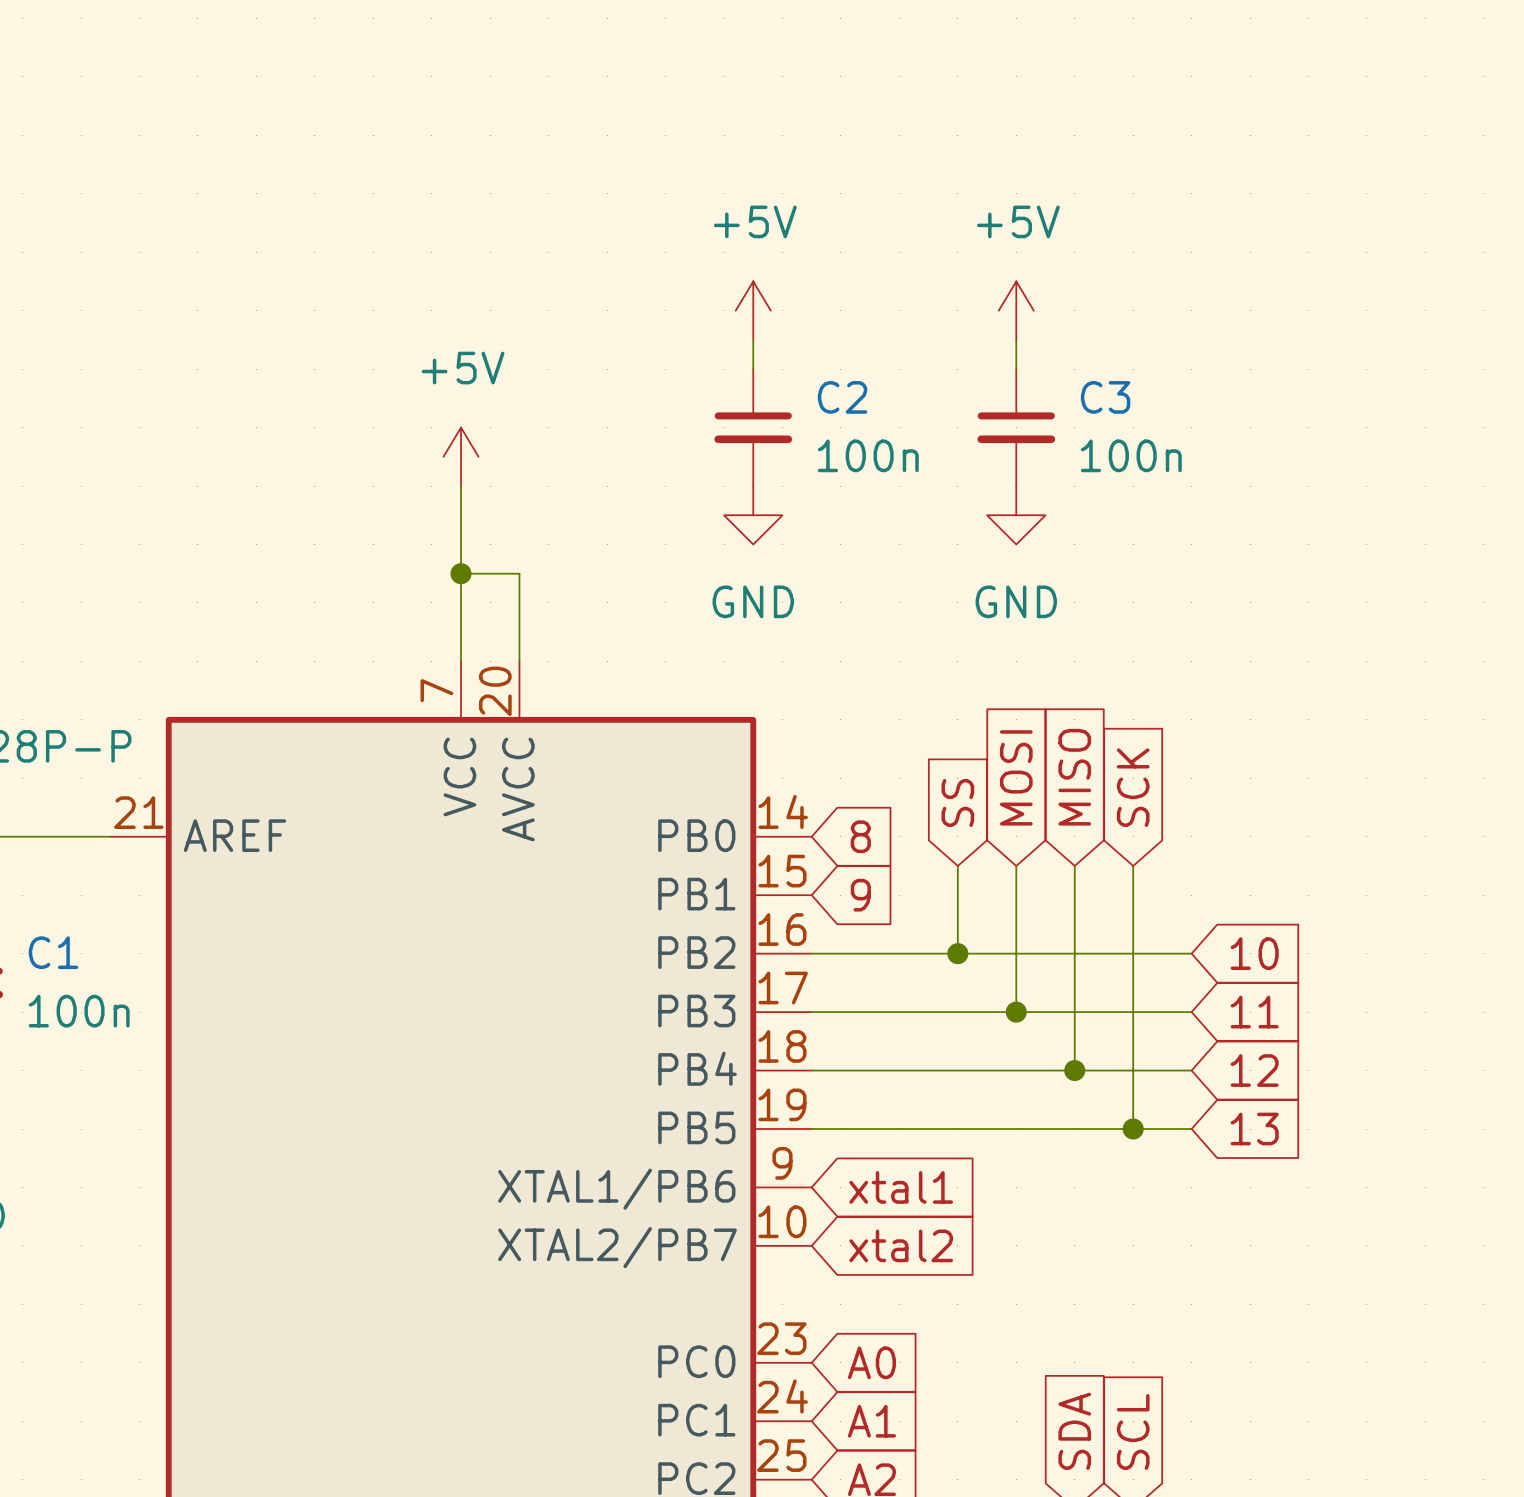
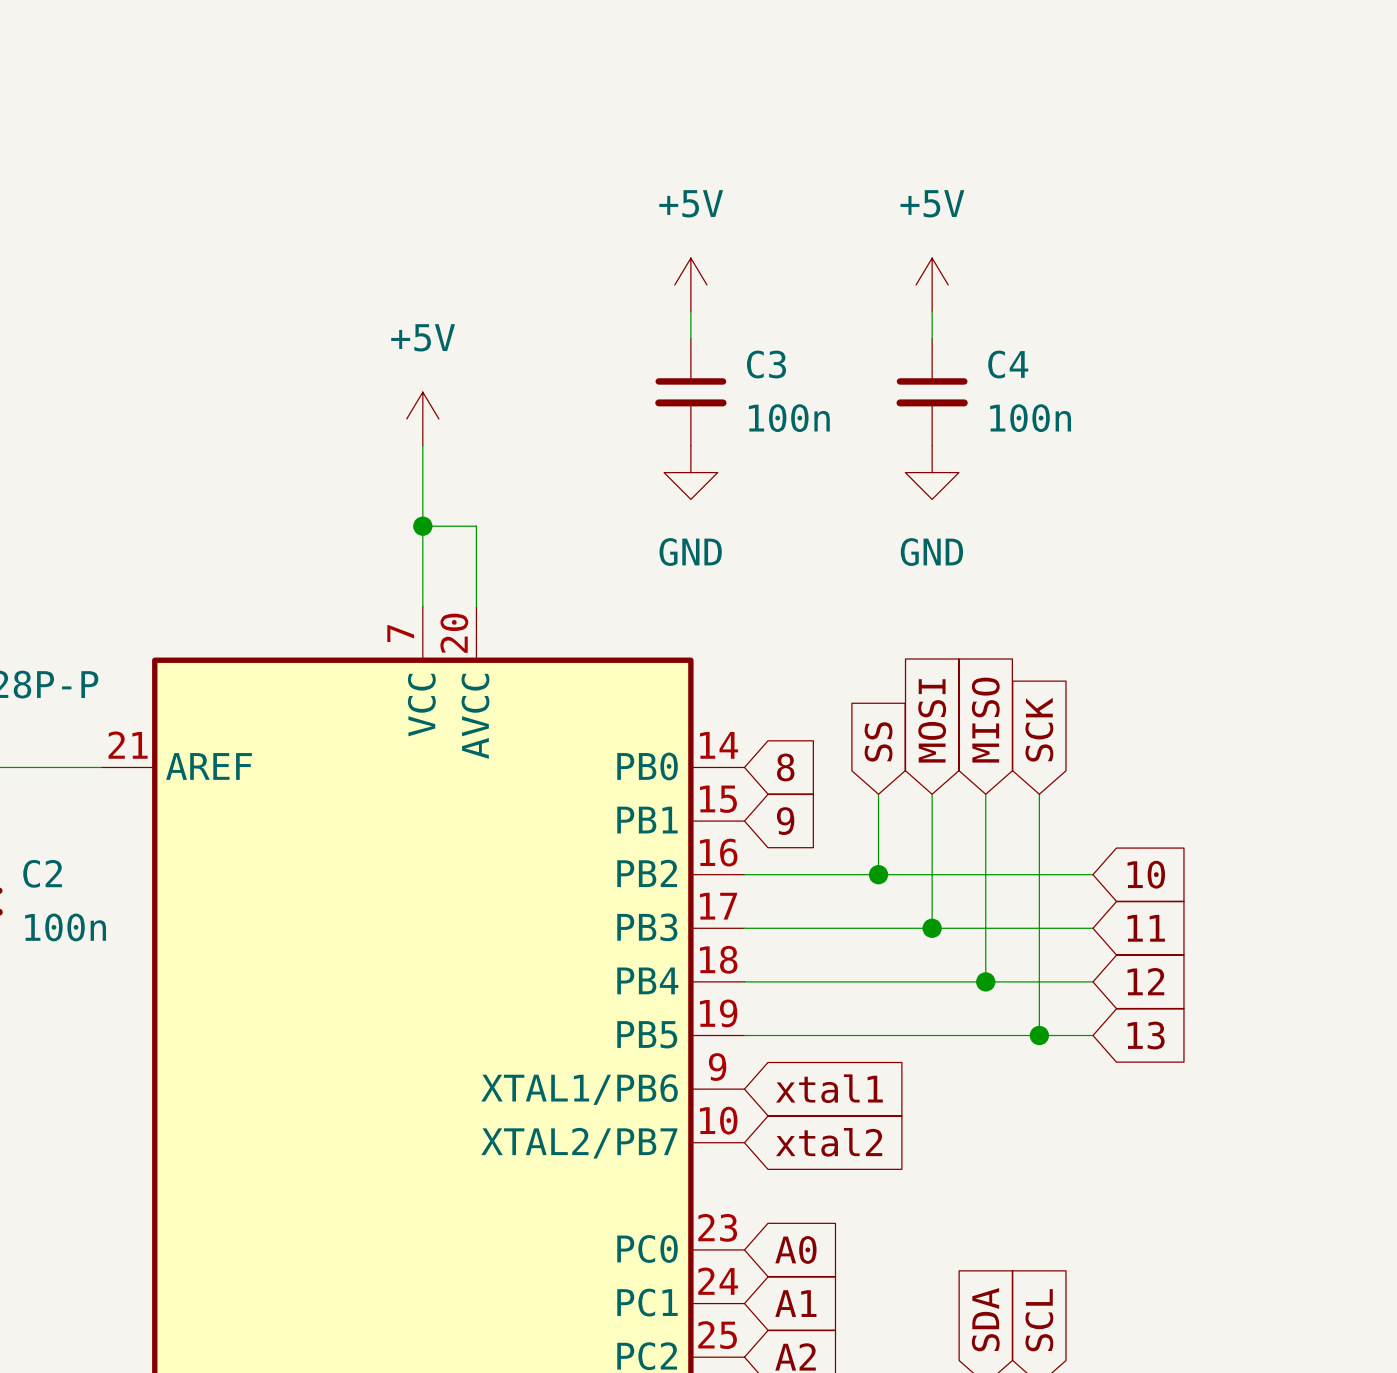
C2 name: C2 (842, 397) -> C3 (766, 364)
C3 name: C3 (1105, 397) -> C4 (1008, 364)
C1 name: C1 (53, 952) -> C2 (42, 873)

